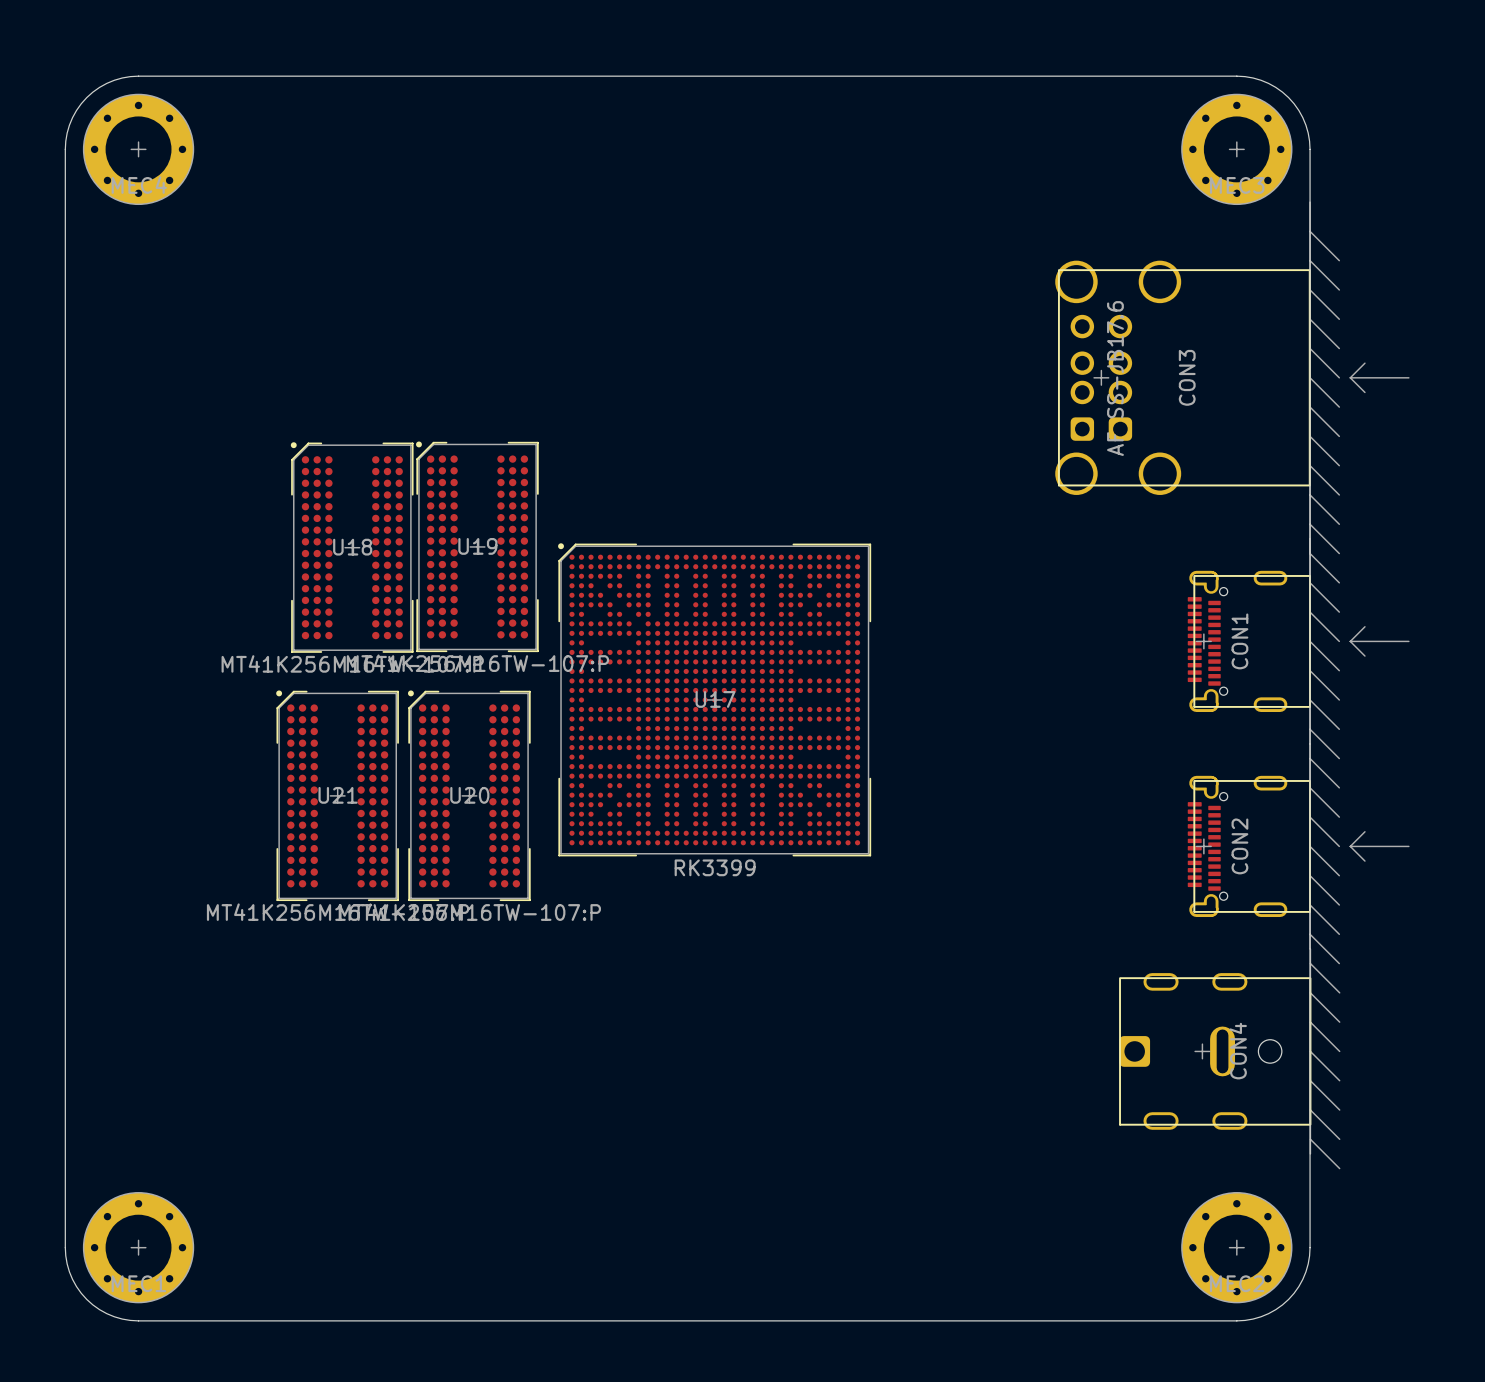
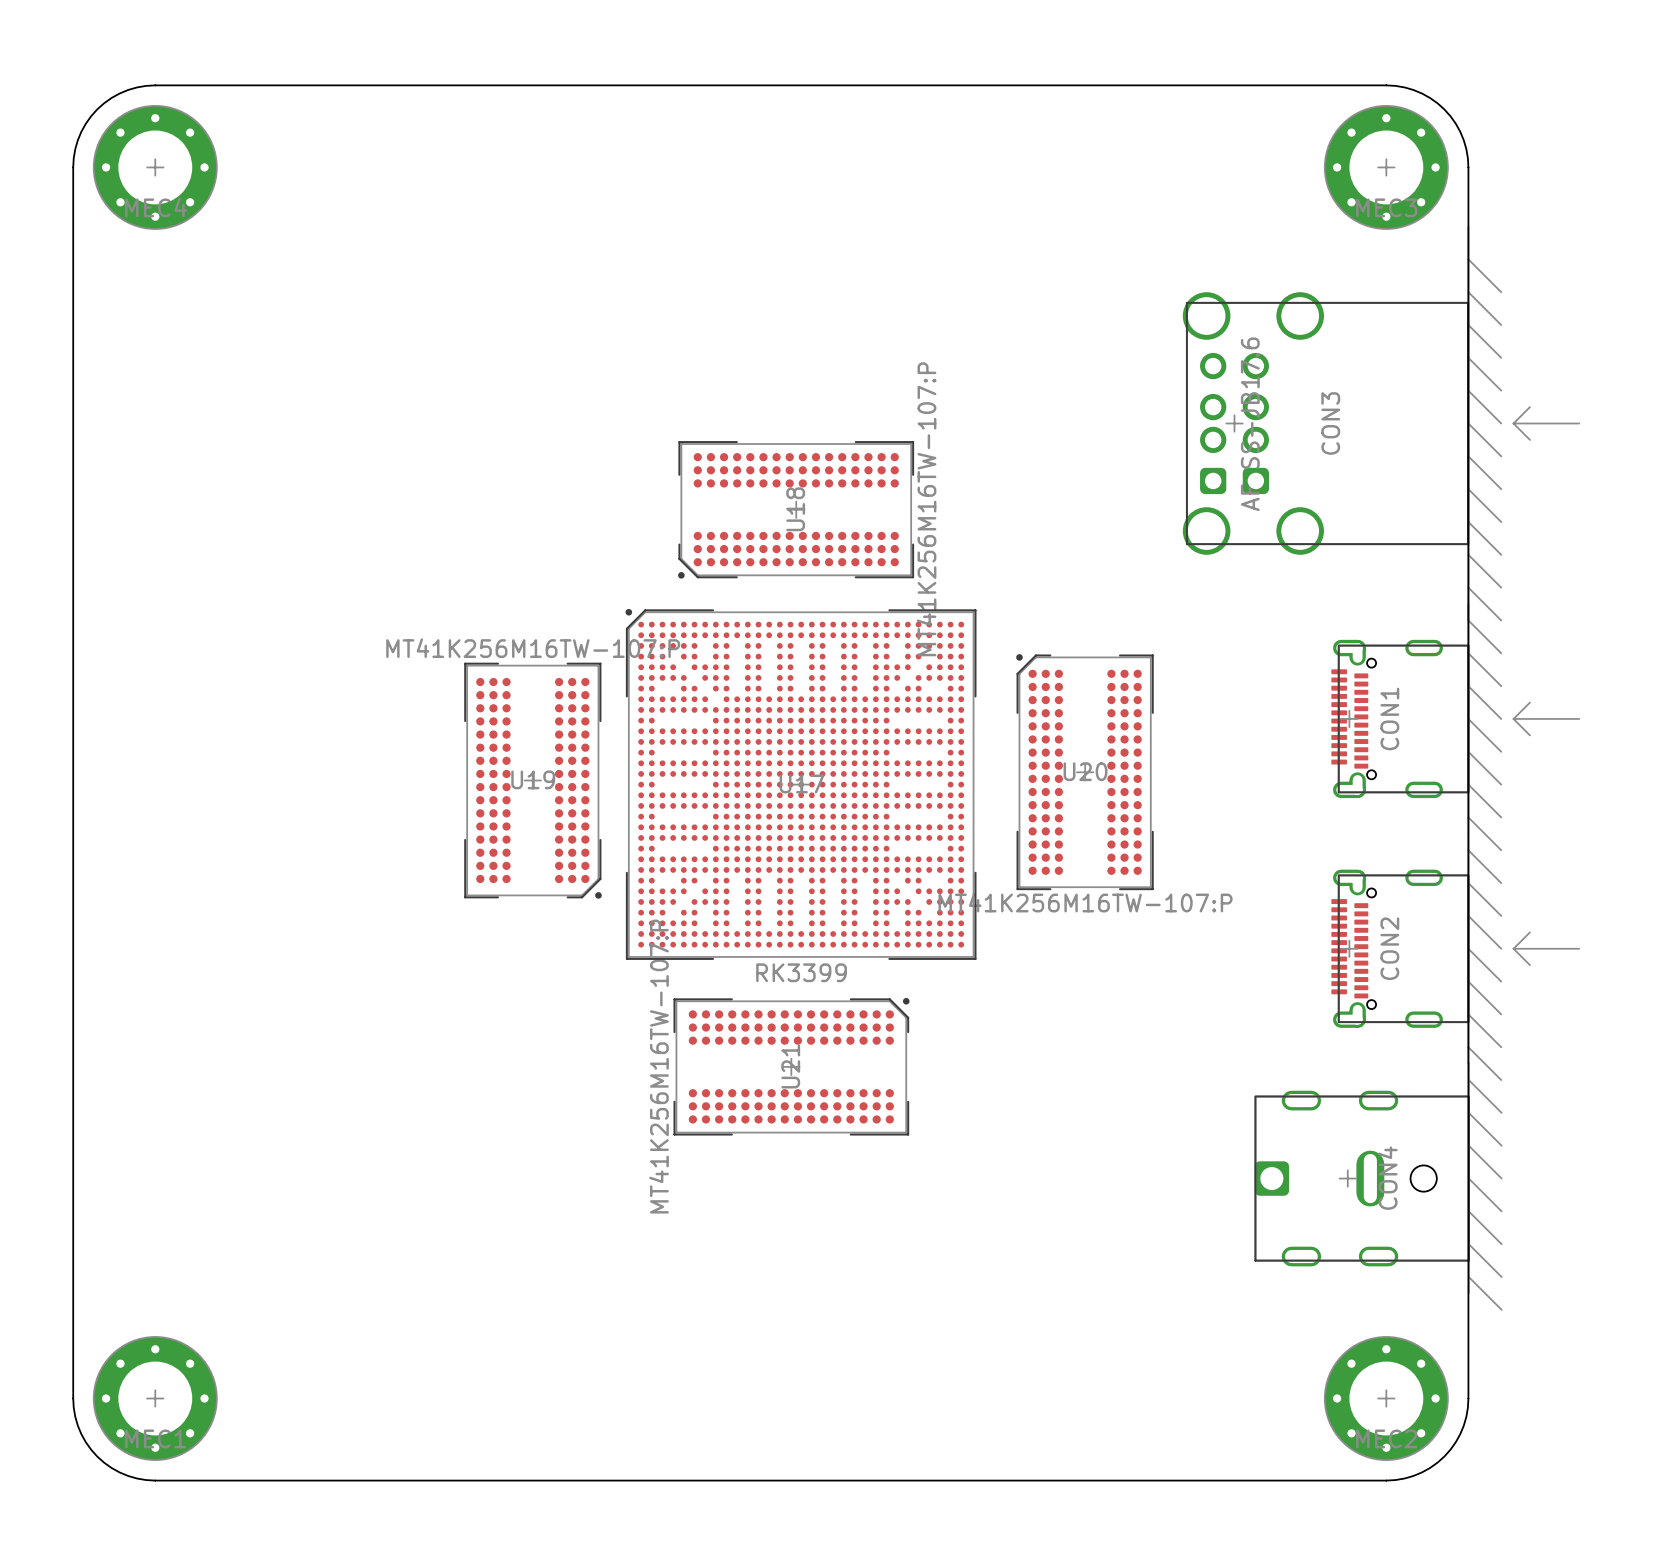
U19 rotation: 0° (477, 546) -> 180° (532, 780)
U19 position: (477, 546) -> (532, 780)
U18 rotation: 0° (352, 547) -> 90° counterclockwise (796, 509)
U18 position: (352, 547) -> (796, 509)
U21 rotation: 0° (337, 795) -> 90° clockwise (791, 1066)
U21 position: (337, 795) -> (791, 1066)
U20 position: (469, 795) -> (1084, 772)

